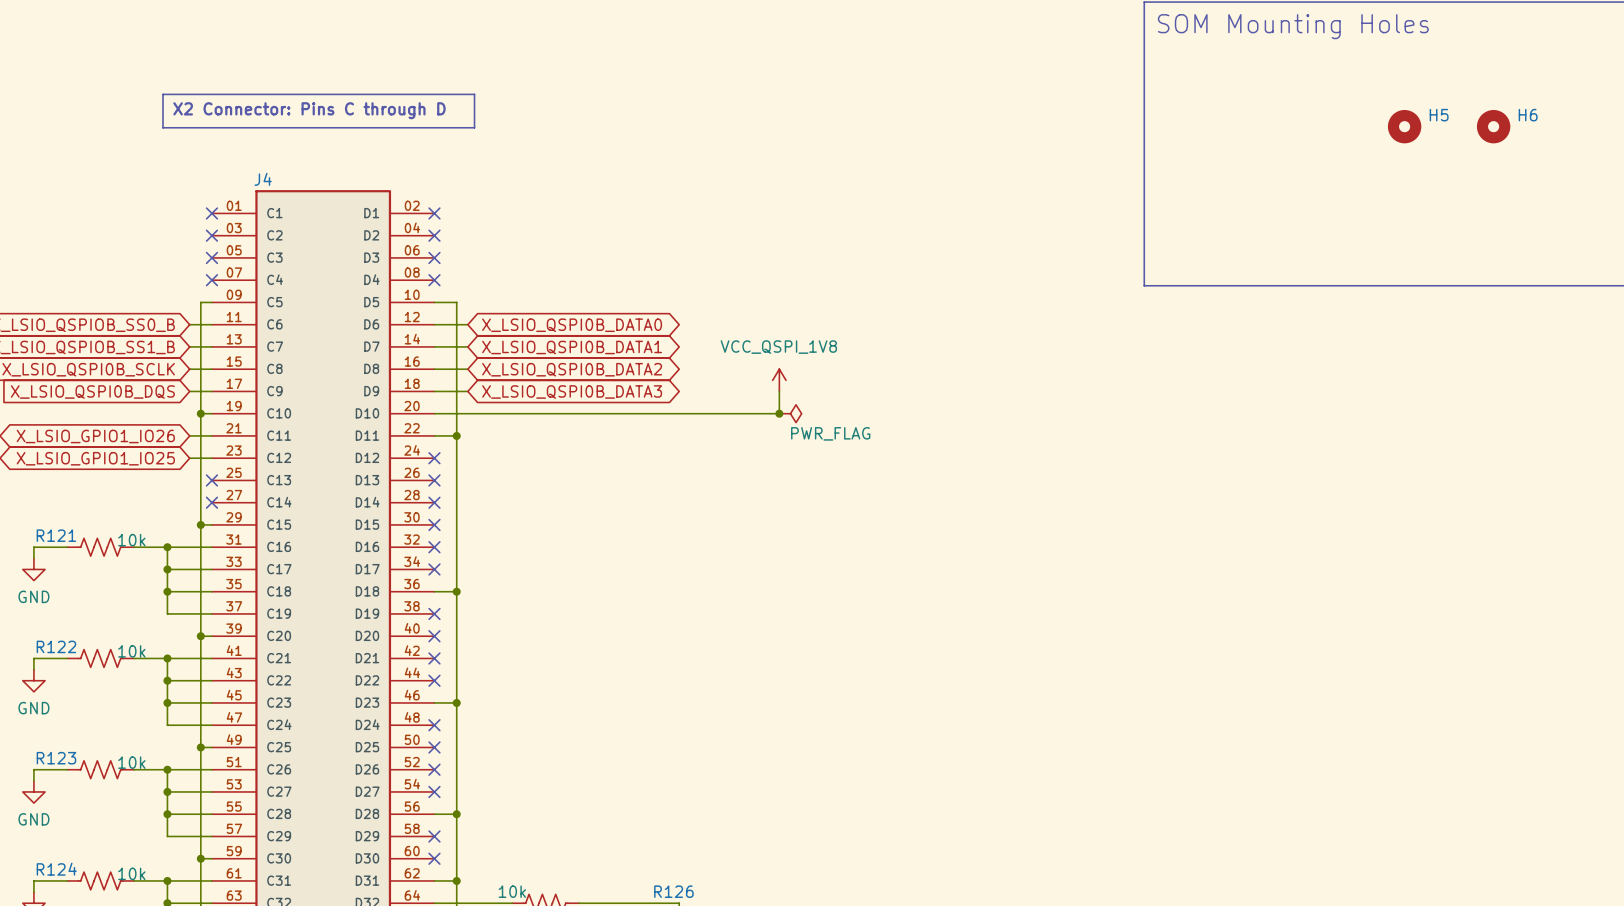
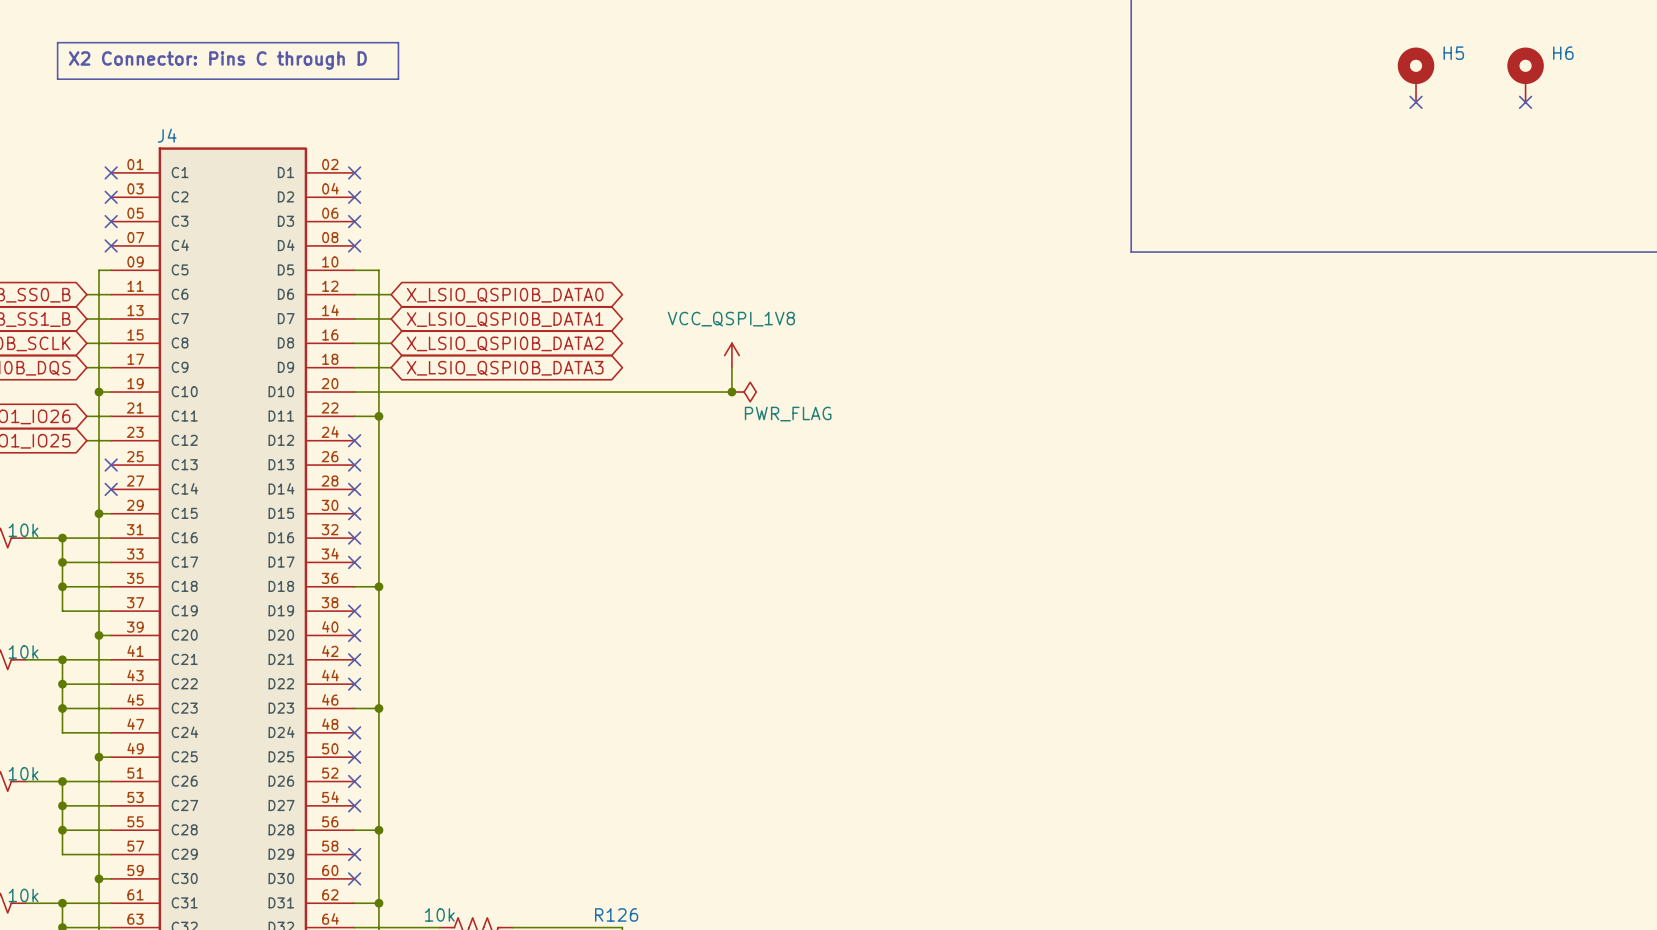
H5 symbol: [1387, 109, 1422, 144] -> [1397, 47, 1435, 103]
H6 symbol: [1476, 109, 1511, 144] -> [1507, 47, 1544, 103]
no-connect mark: none -> (1416, 102)
no-connect mark: none -> (1525, 102)

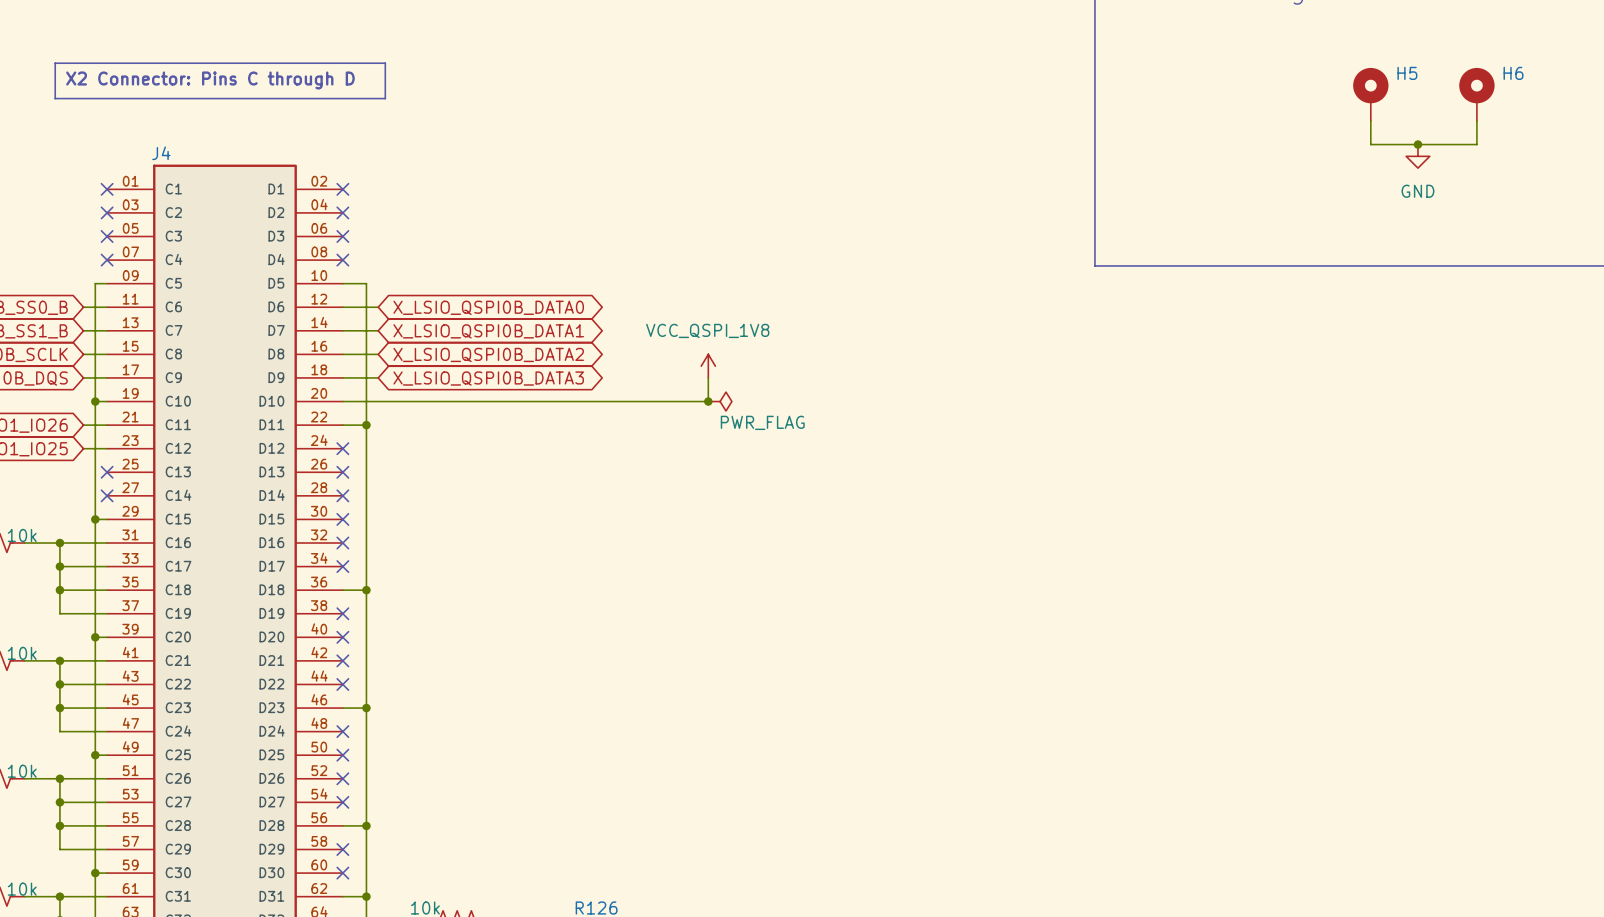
wire: none -> (1370, 120) (1370, 144) (1476, 144) (1476, 120)
no-connect mark: (1416, 102) -> none
no-connect mark: (1525, 102) -> none
junction: none -> (1417, 144)
power symbol: none -> GND (1417, 156)

